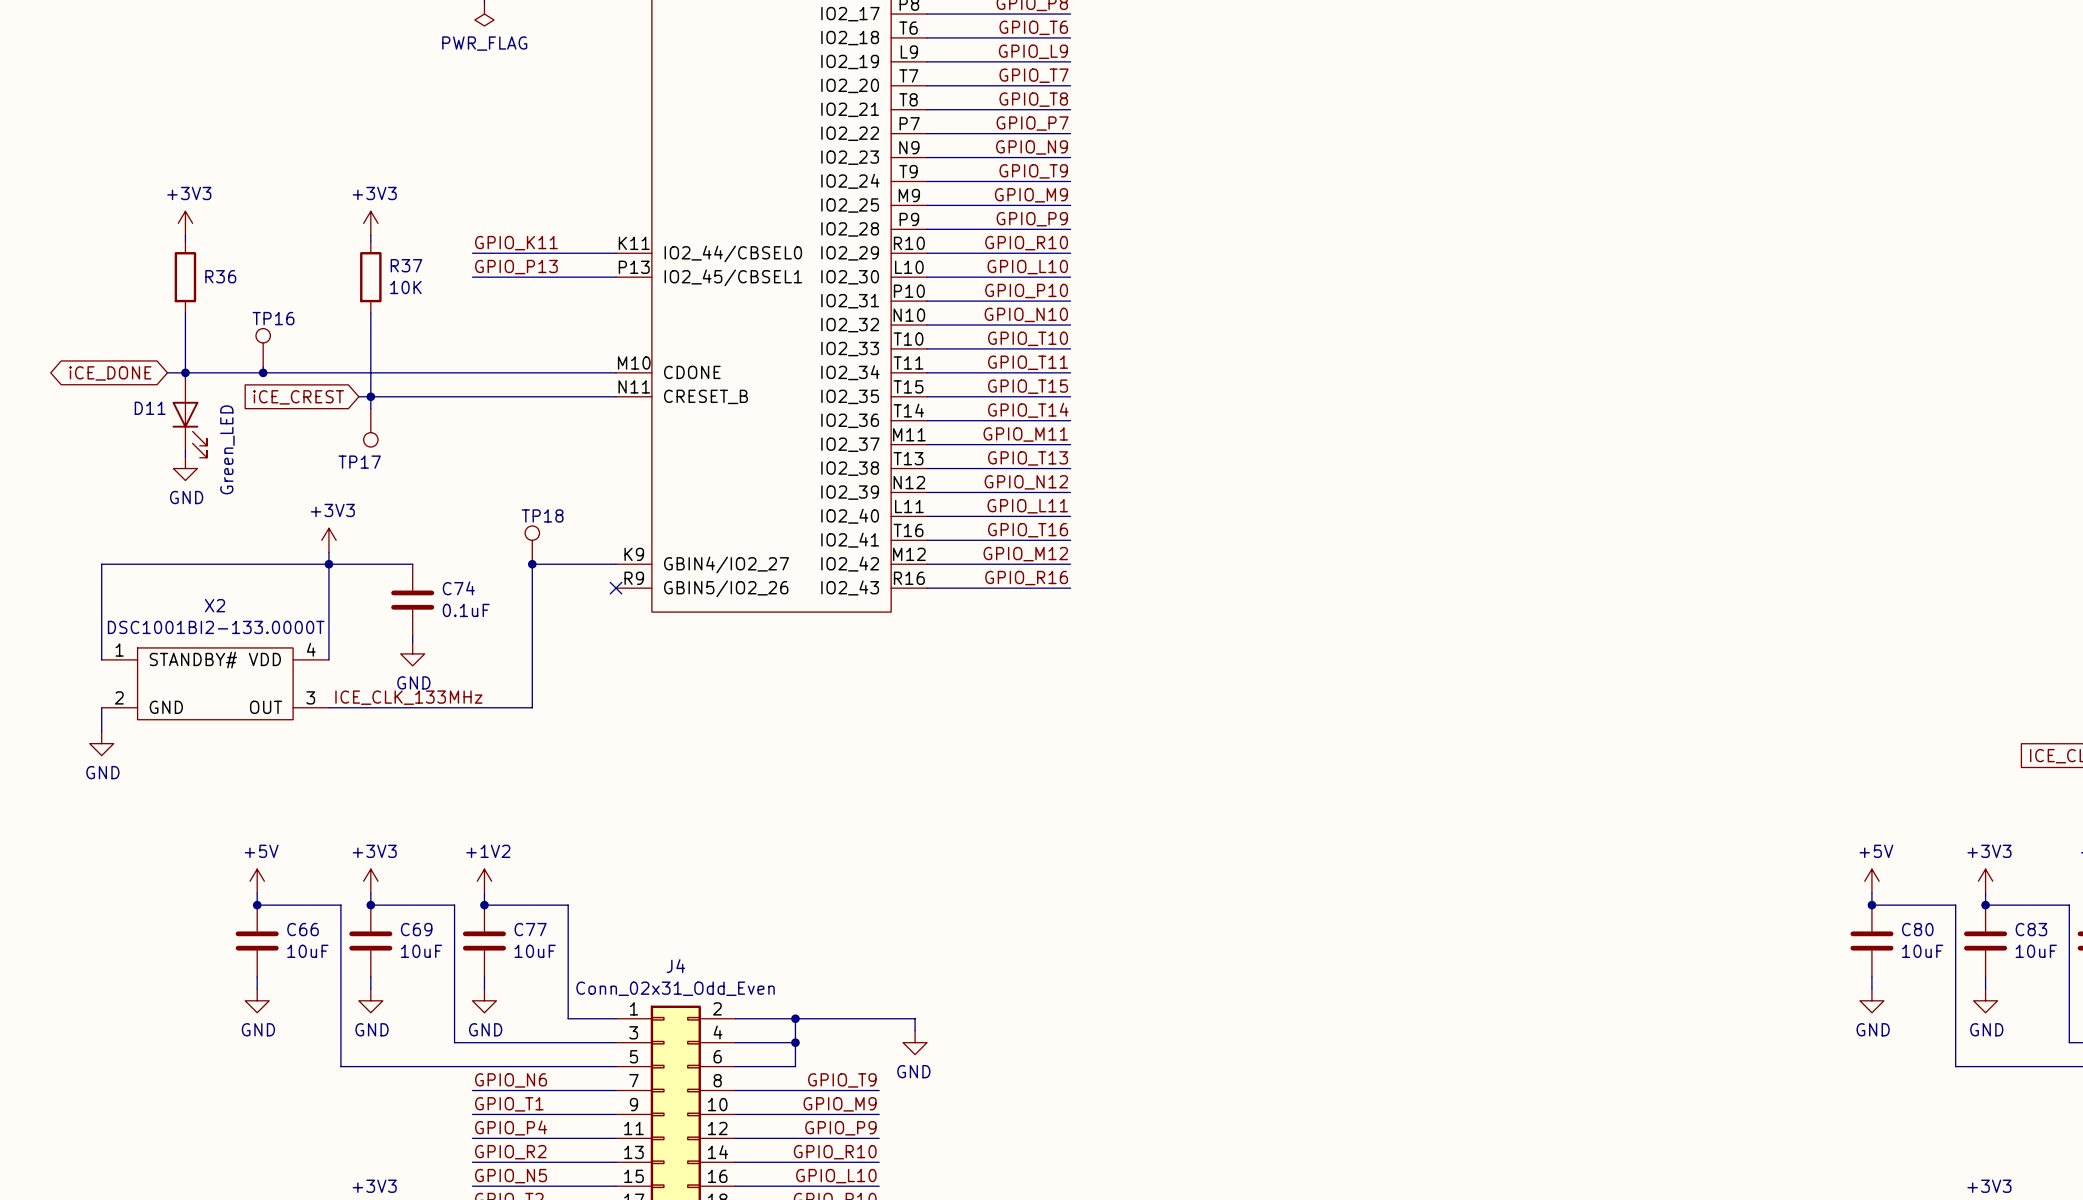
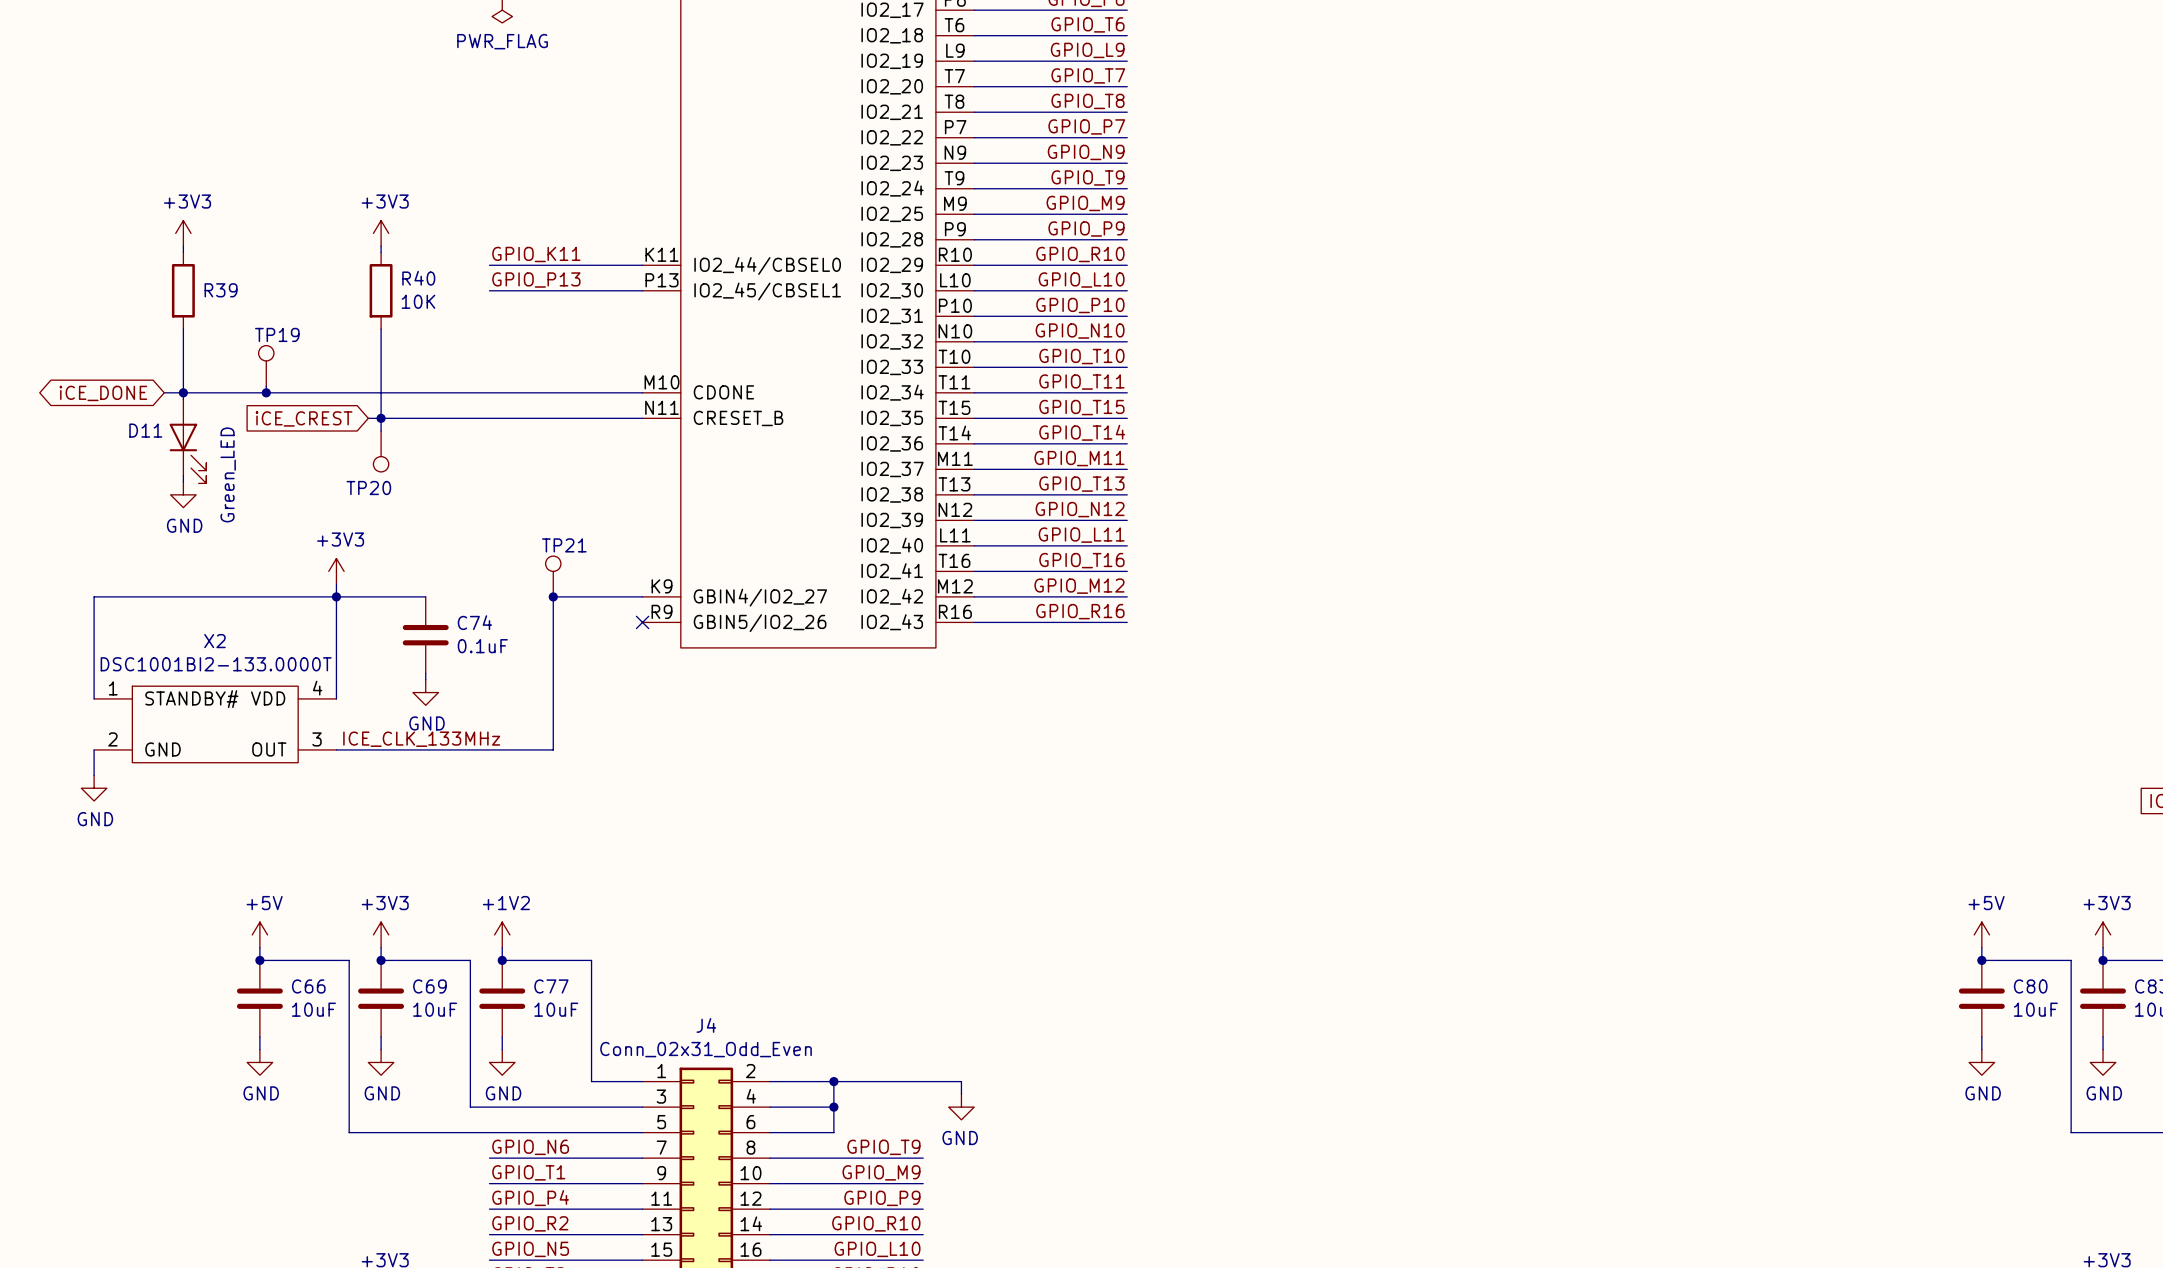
R37 name: R37 (406, 265) -> R40 (418, 278)
R36 name: R36 (220, 276) -> R39 (221, 290)
TP16 name: TP16 (273, 318) -> TP19 (277, 334)
TP17 name: TP17 (359, 462) -> TP20 (368, 488)
TP18 name: TP18 (542, 515) -> TP21 (564, 545)

